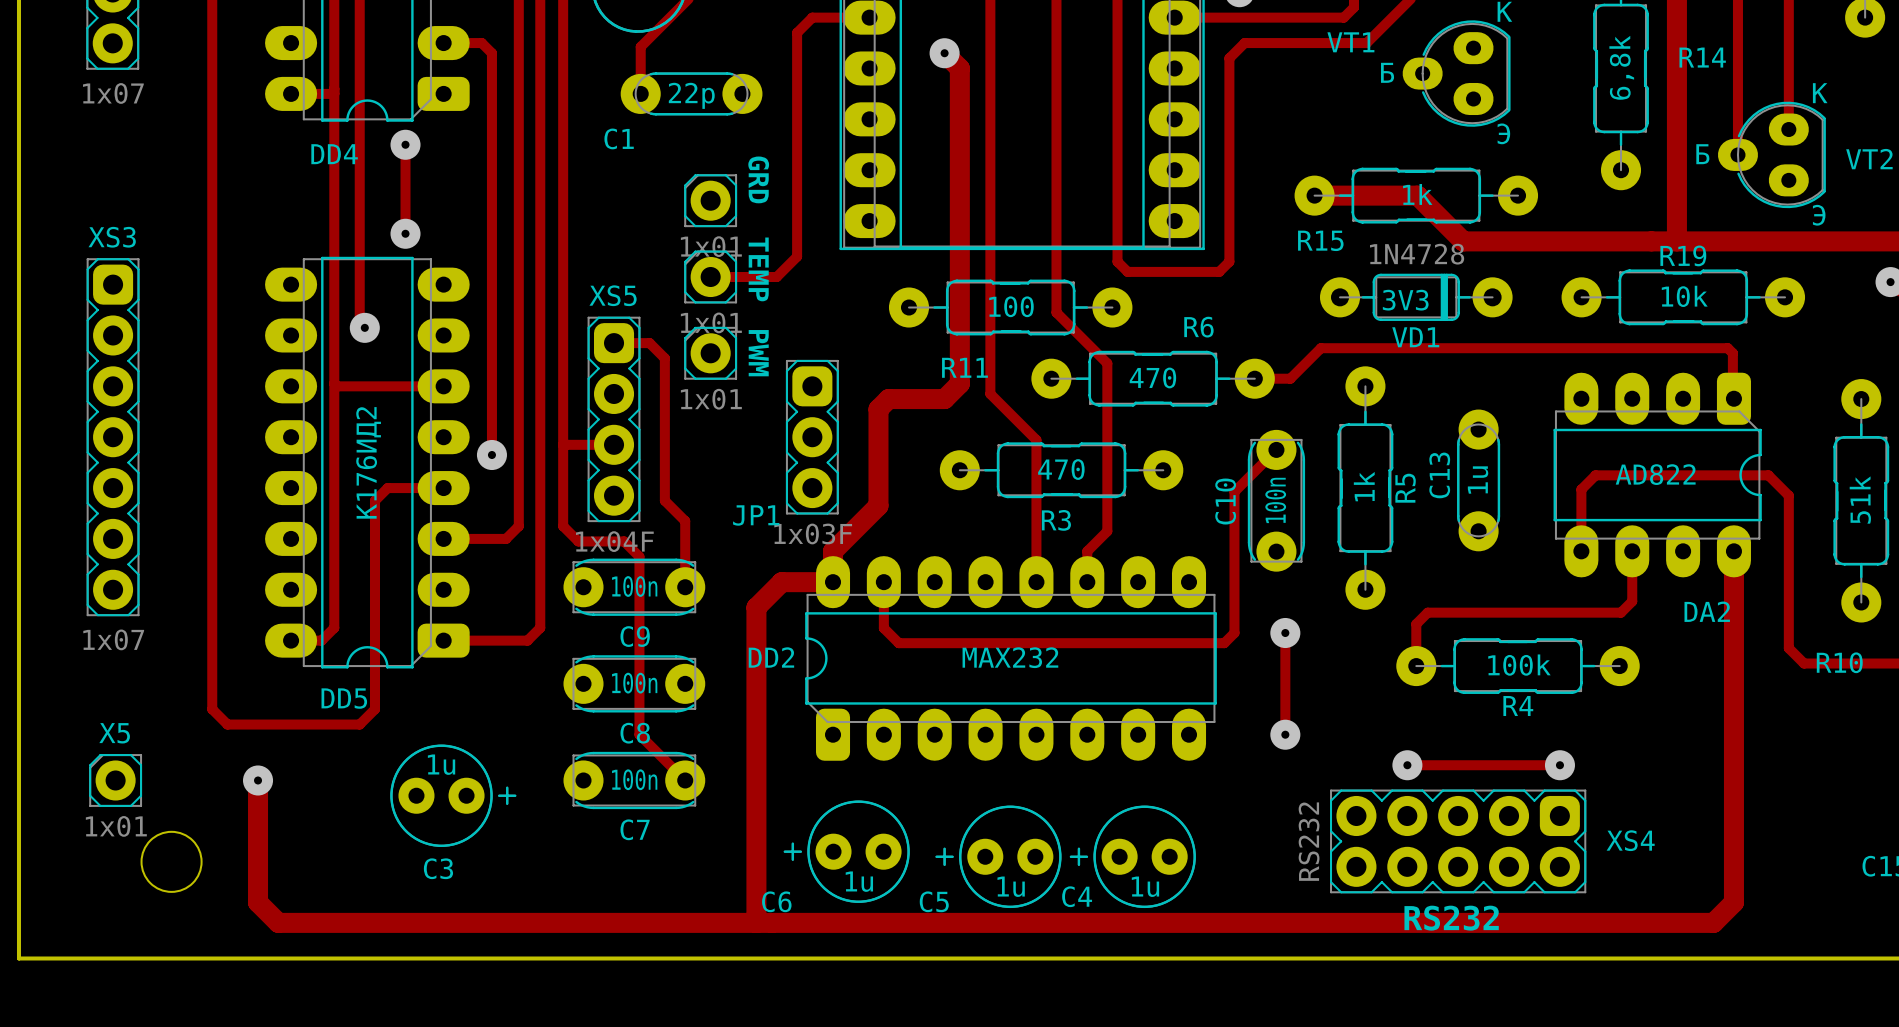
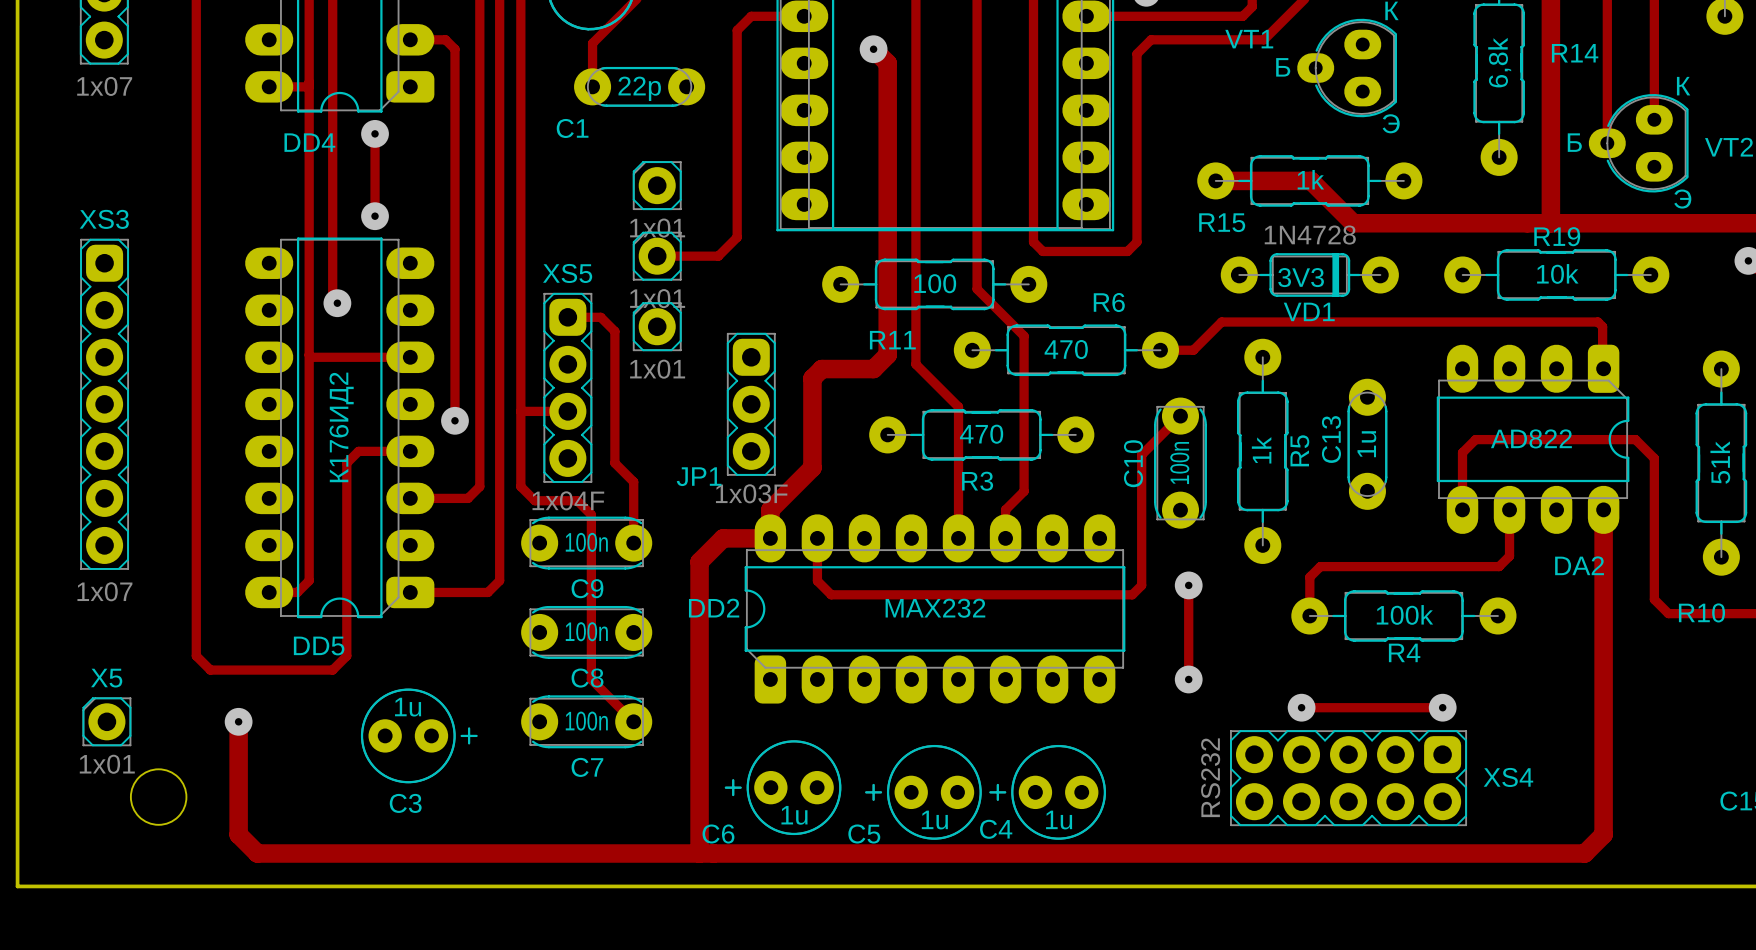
text: GRD (758, 179) -> none
text: TEMP (758, 269) -> none
text: PWM (758, 353) -> none
text: RS232 (1451, 918) -> none

